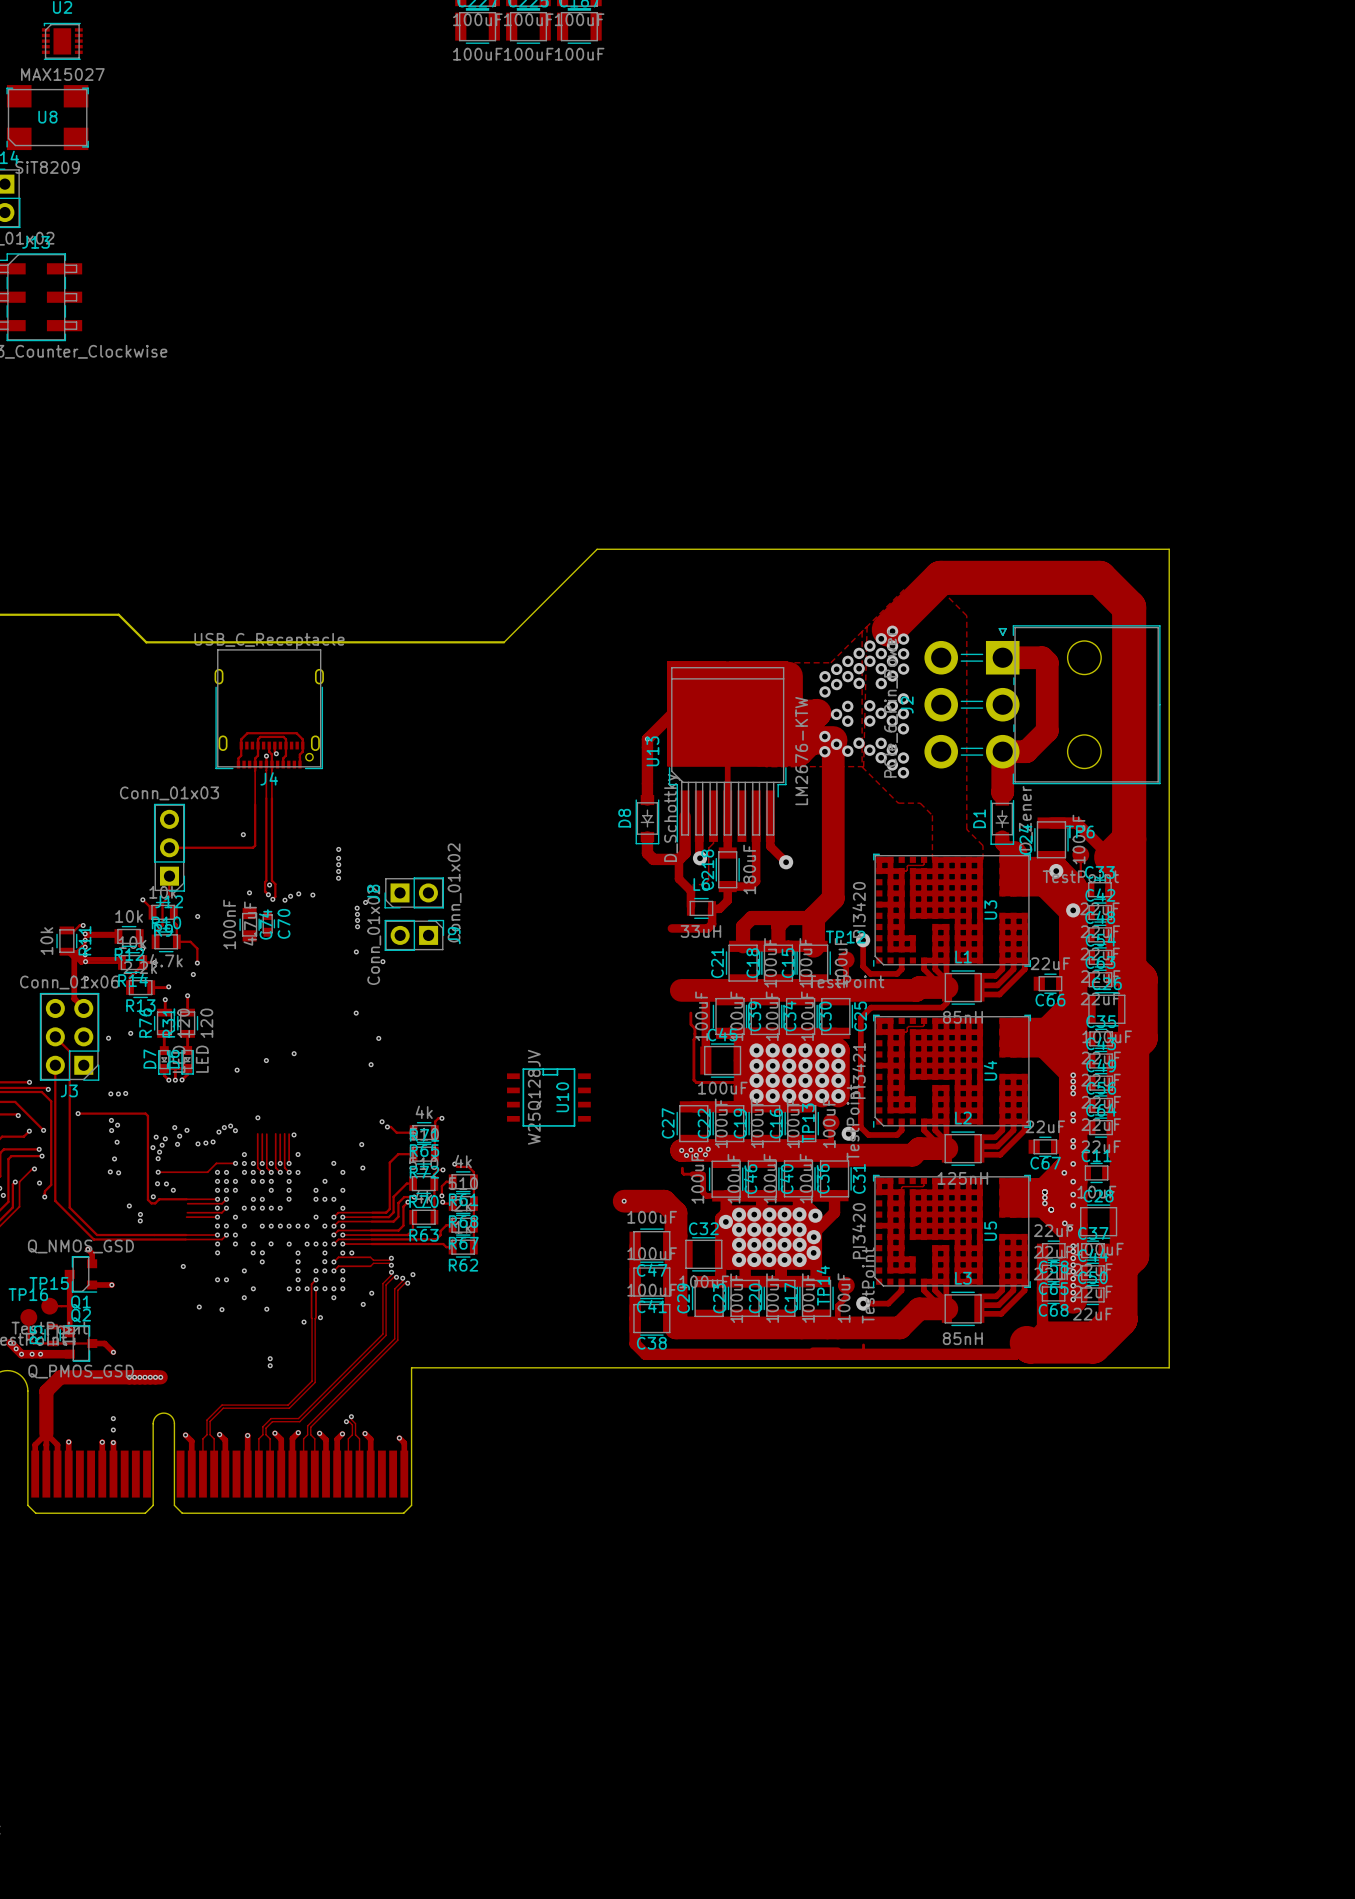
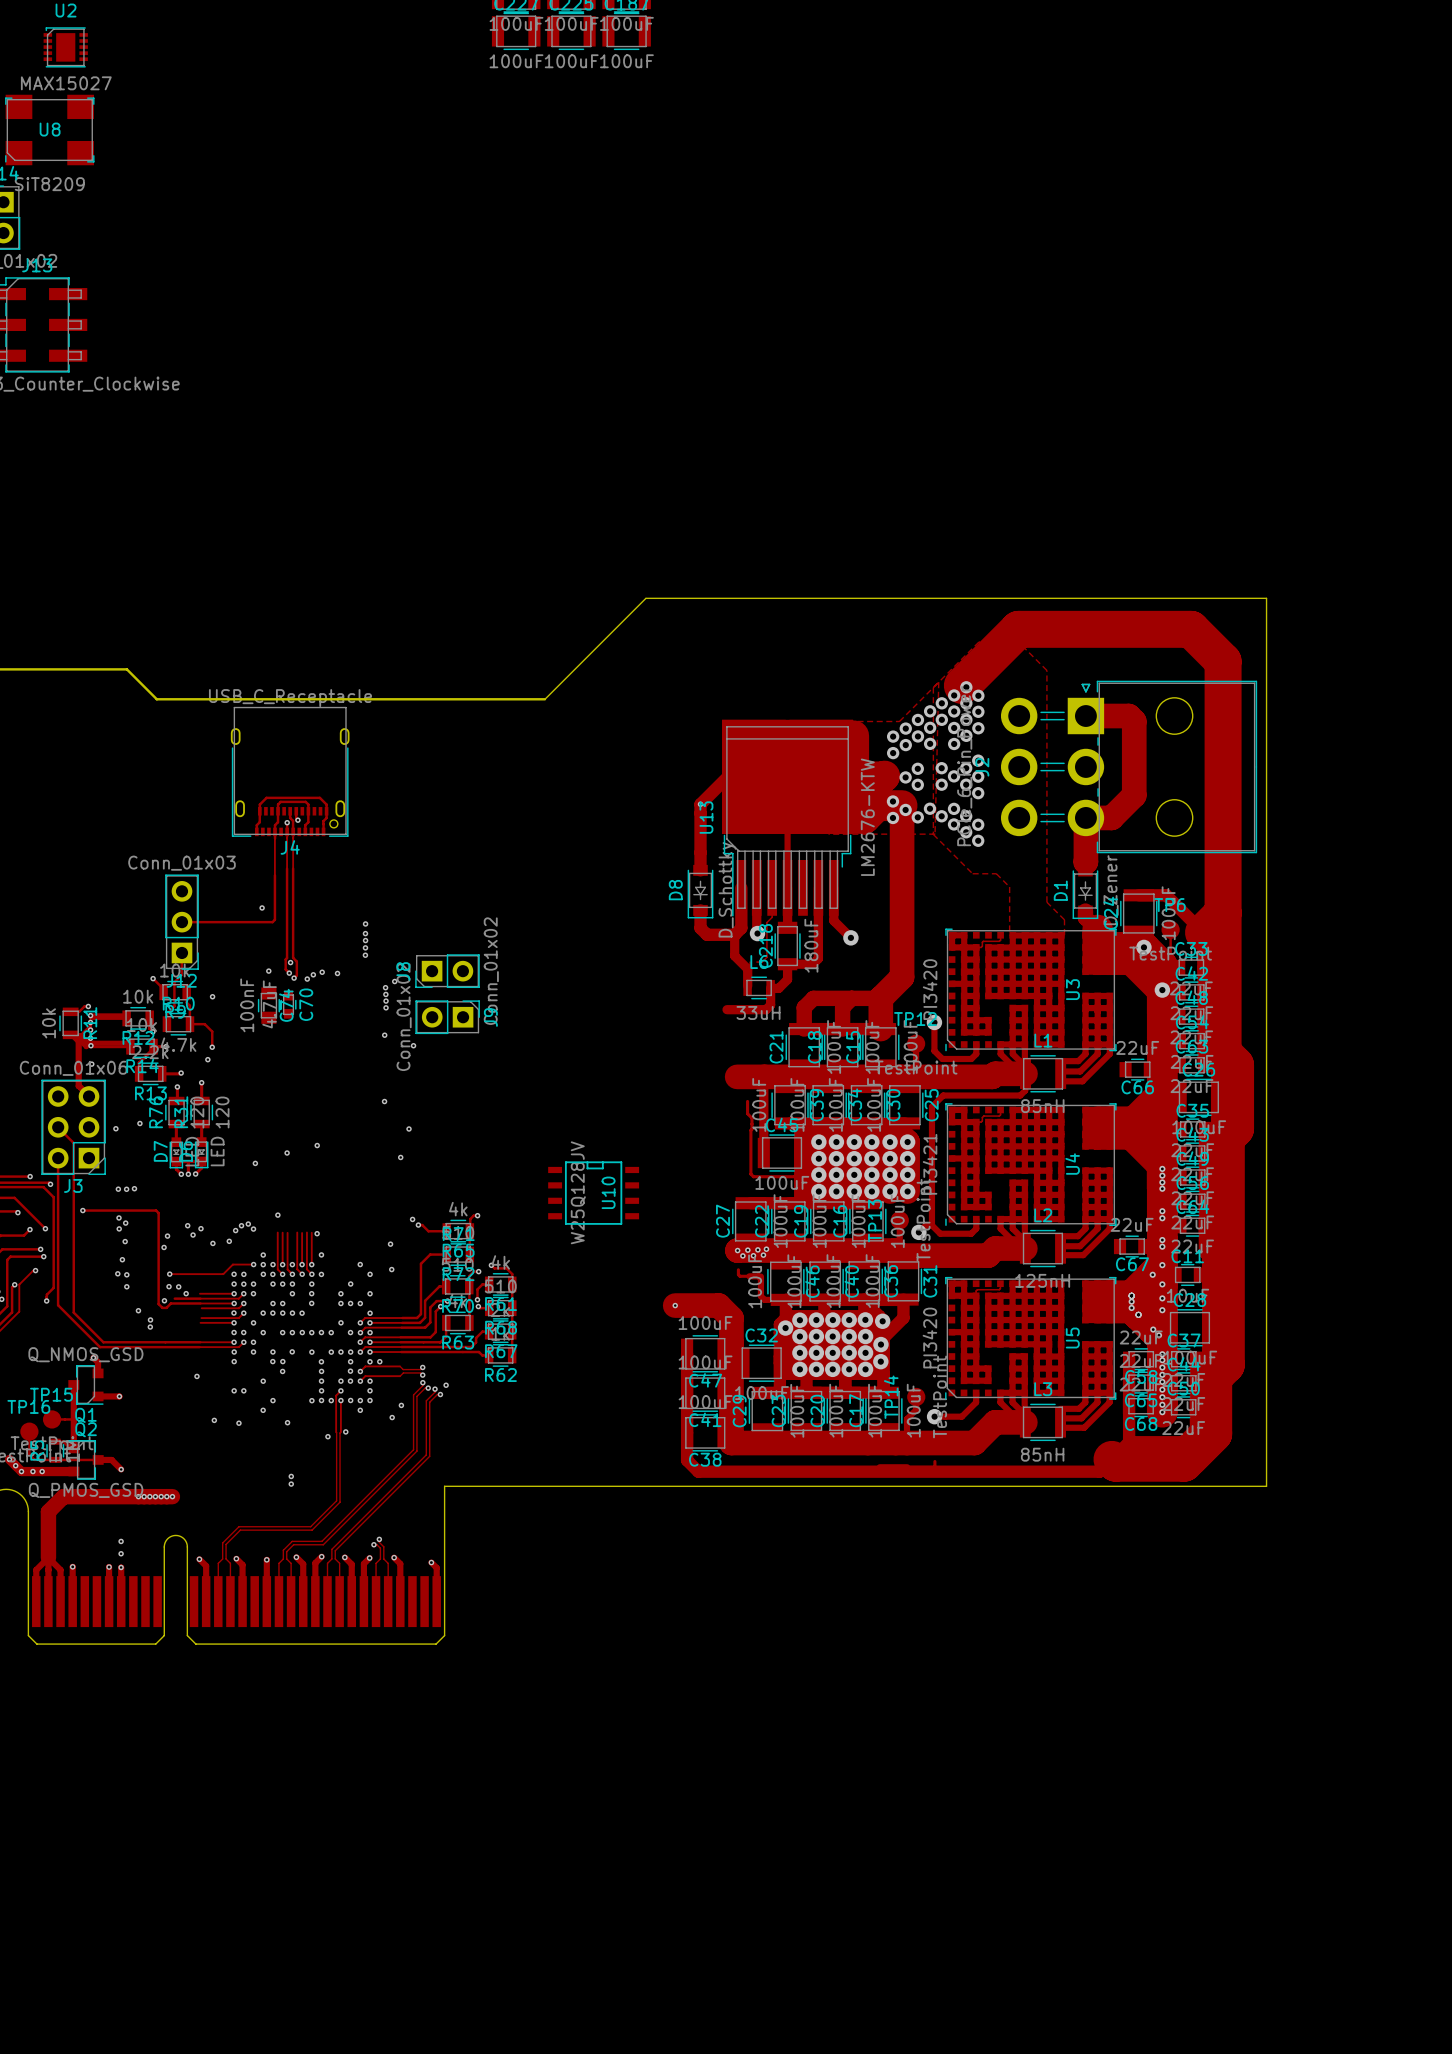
via: (165, 1138) -> none
via: (205, 1143) -> none
via: (177, 1144) -> none
via: (162, 1145) -> none
via: (159, 1152) -> none
via: (158, 1158) -> none
via: (39, 1183) -> none
via: none -> (126, 1286)
track: none -> (199, 1293) (234, 1293)
track: none -> (243, 1293) (238, 1298) (174, 1298)

